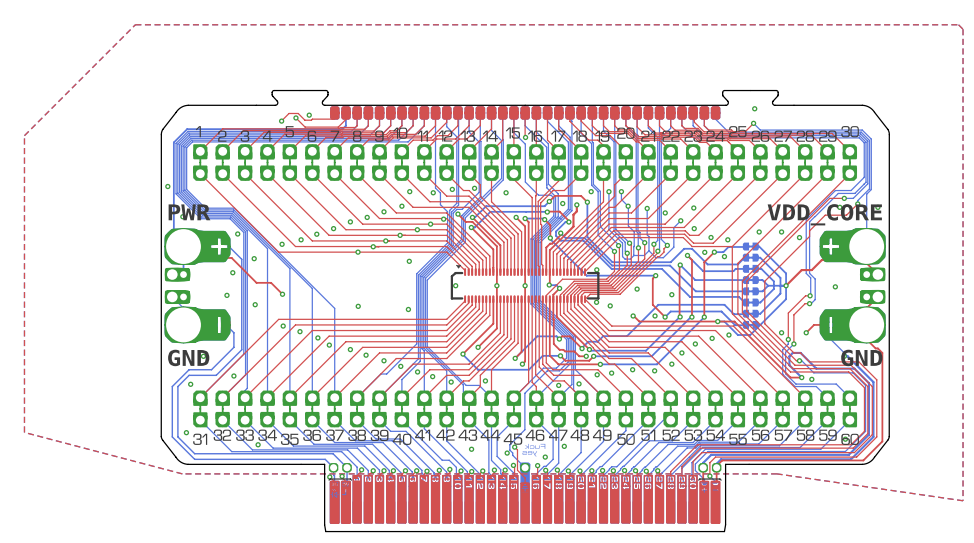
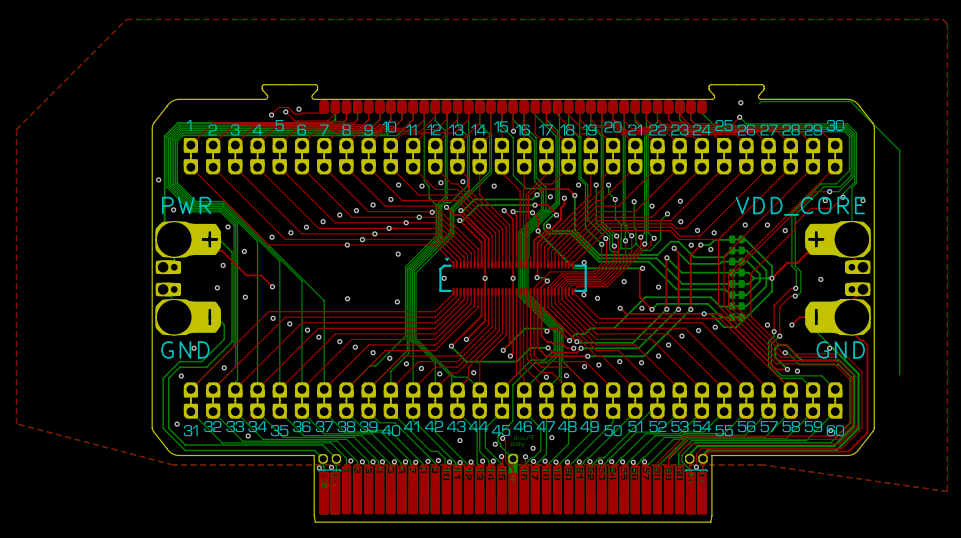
bottom track: none -> (759, 103) (761, 101) (850, 101) (899, 150) (899, 374)

